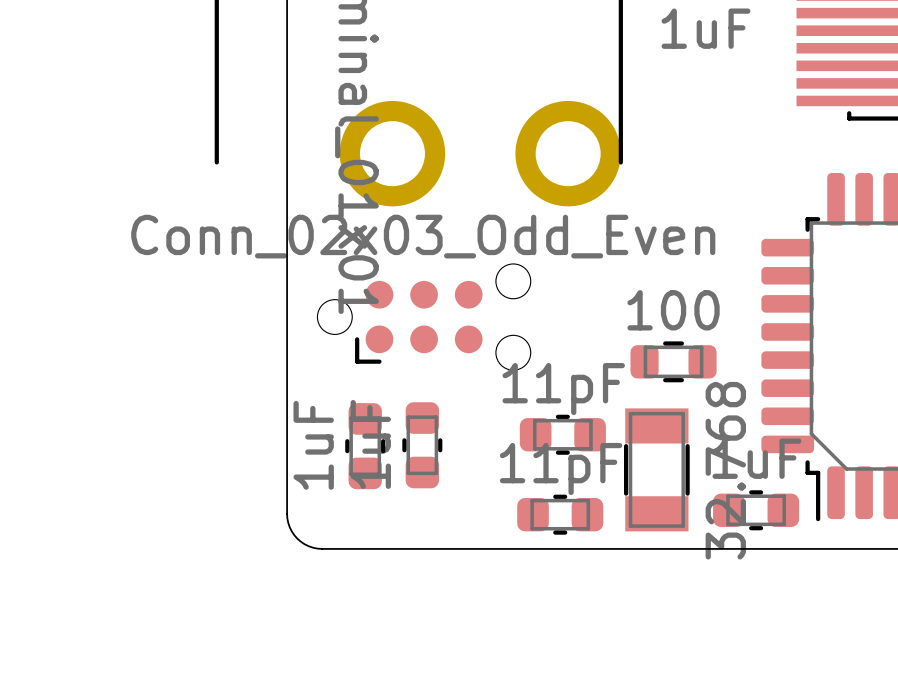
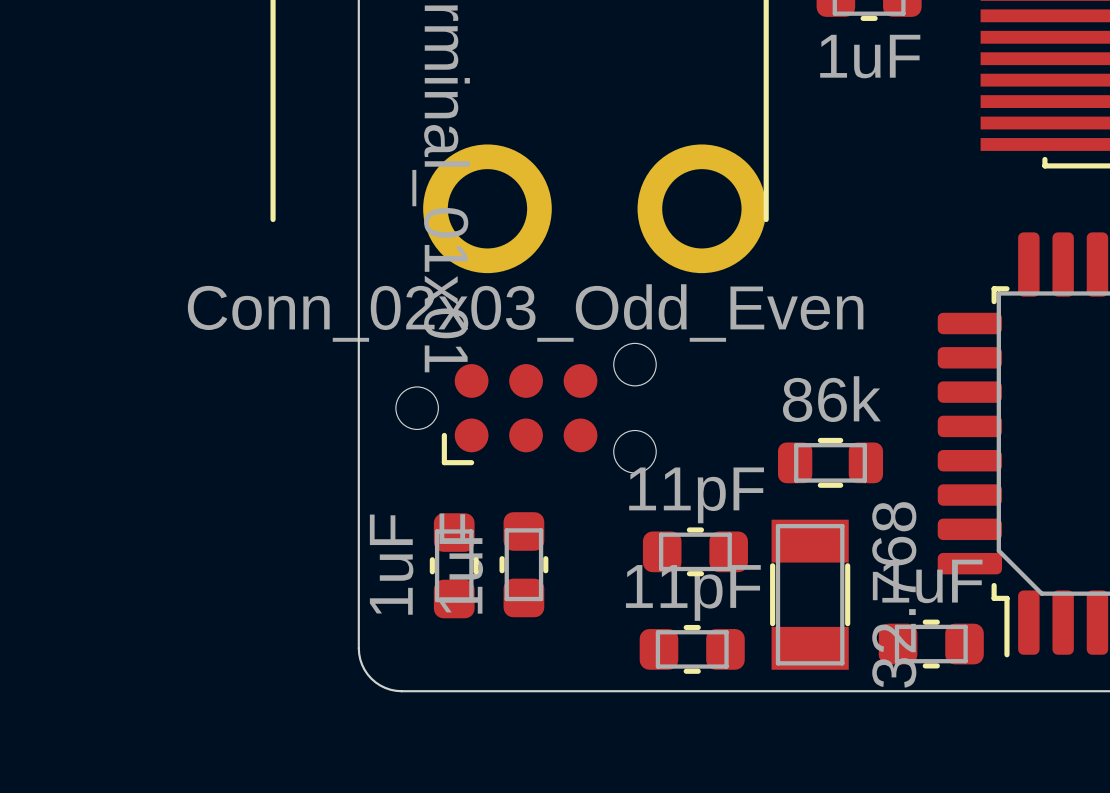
part value: 100 (673, 310) -> 86k (831, 399)

